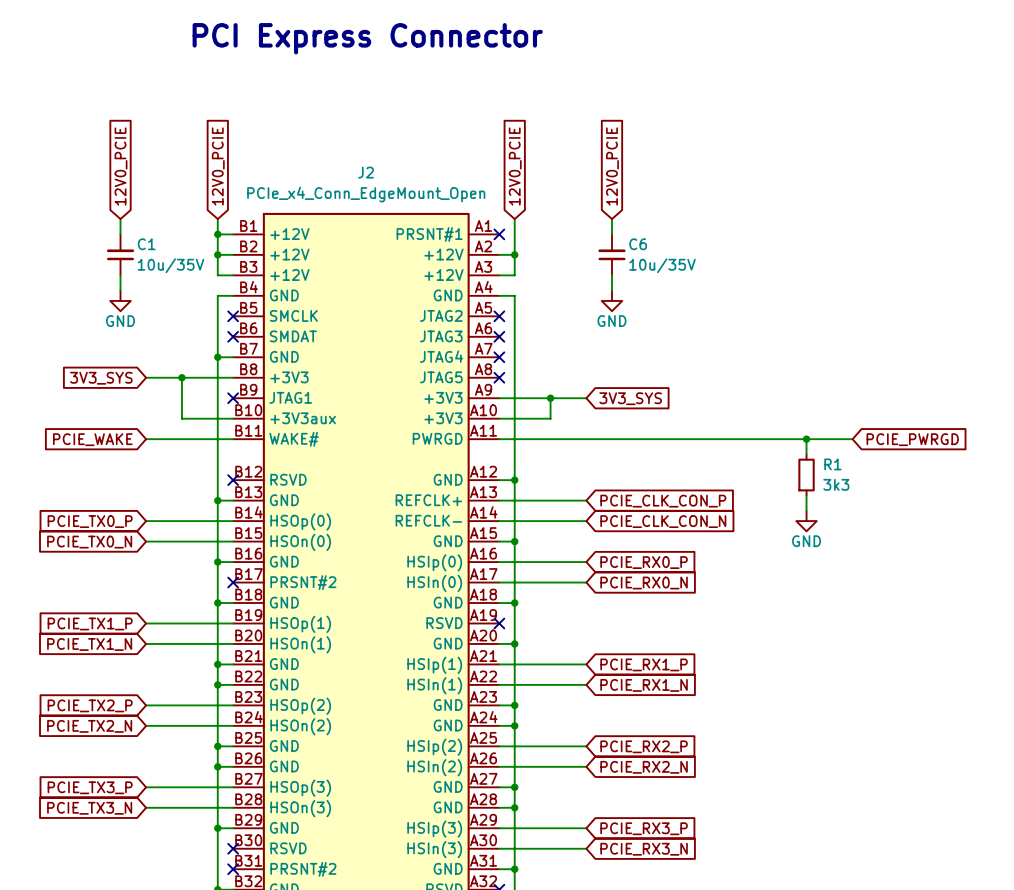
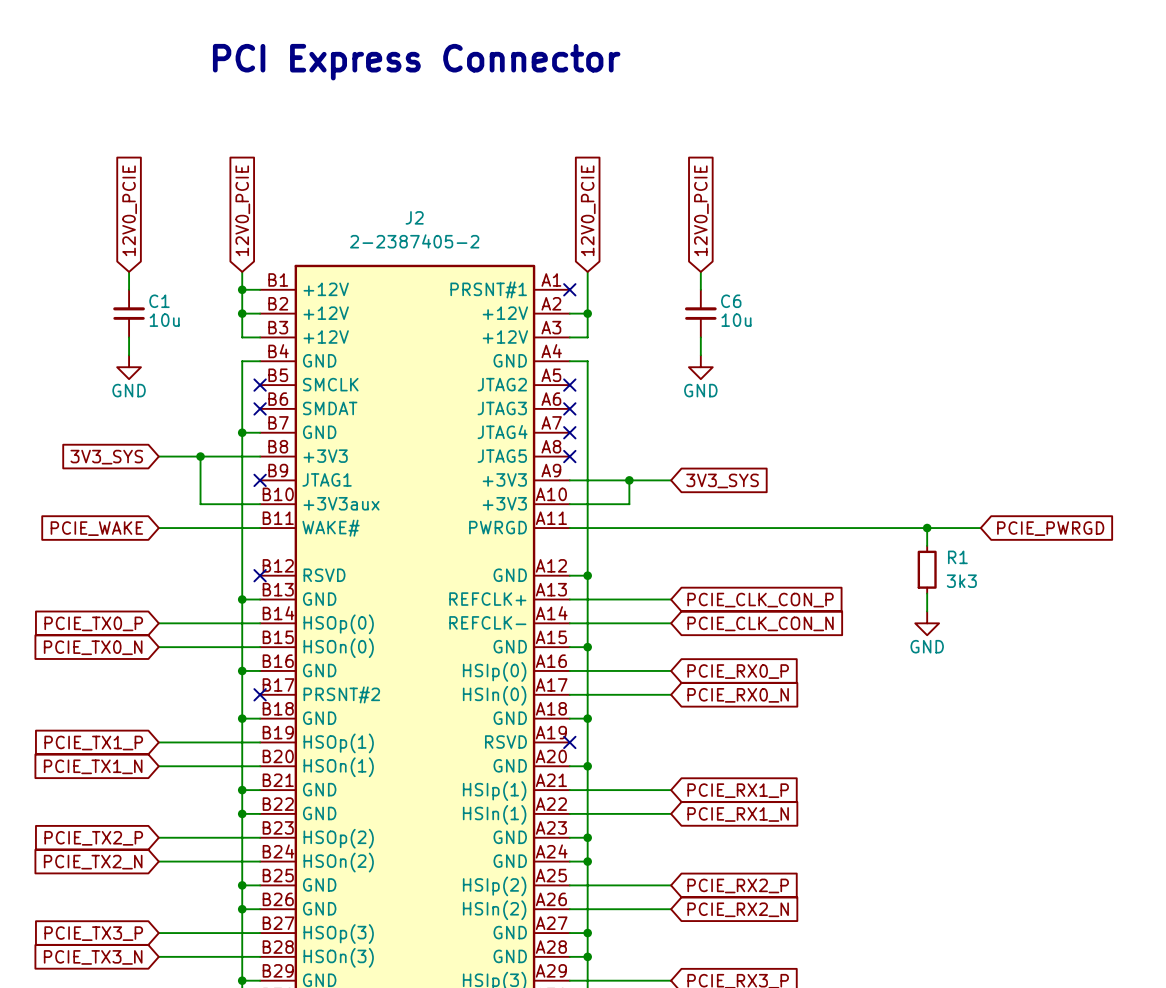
J2 text: none -> 2-2387405-2 (414, 241)
J2 value: PCIe_x4_Conn_EdgeMount_Open (366, 194) -> none
C1 text: 10u/35V (171, 265) -> 10u (164, 320)
C6 text: 10u/35V (662, 265) -> 10u (736, 320)

